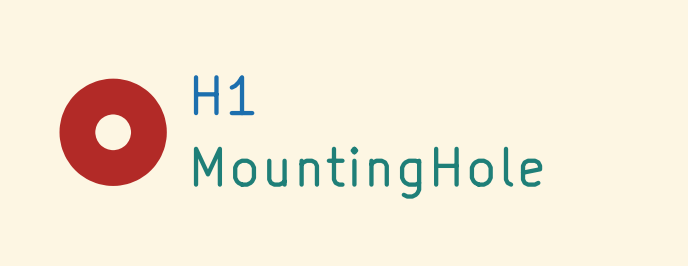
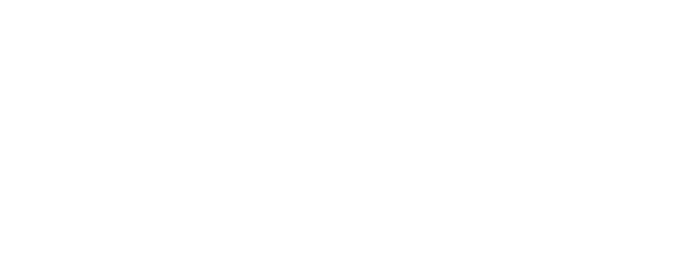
H1: MountingHole (113, 132) -> none

